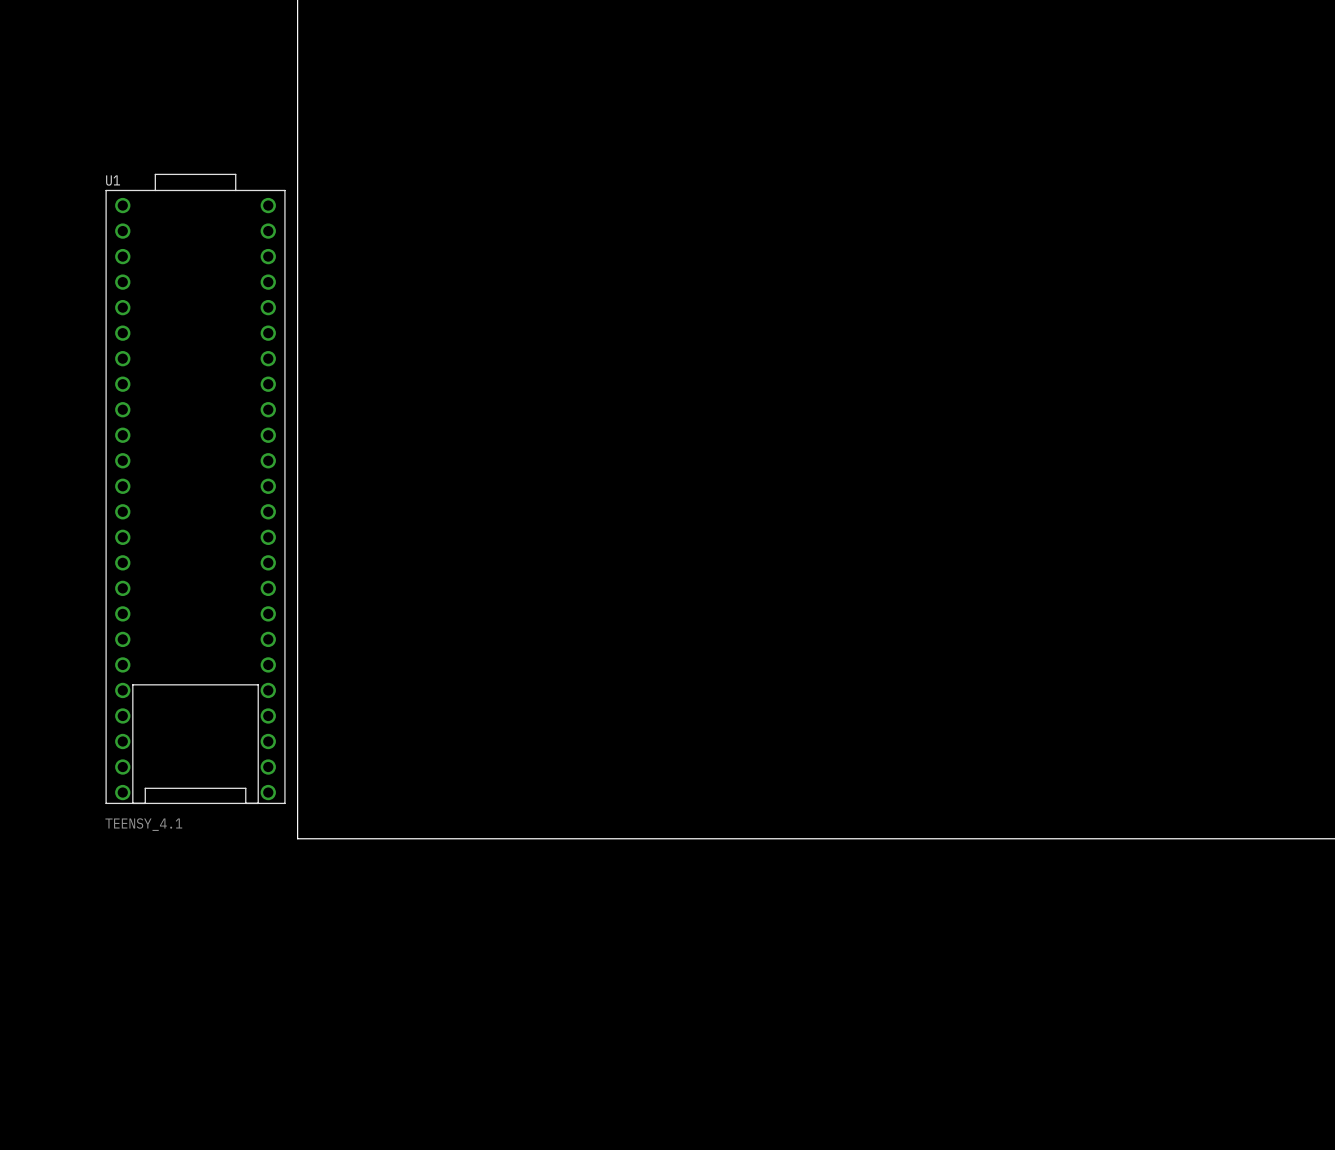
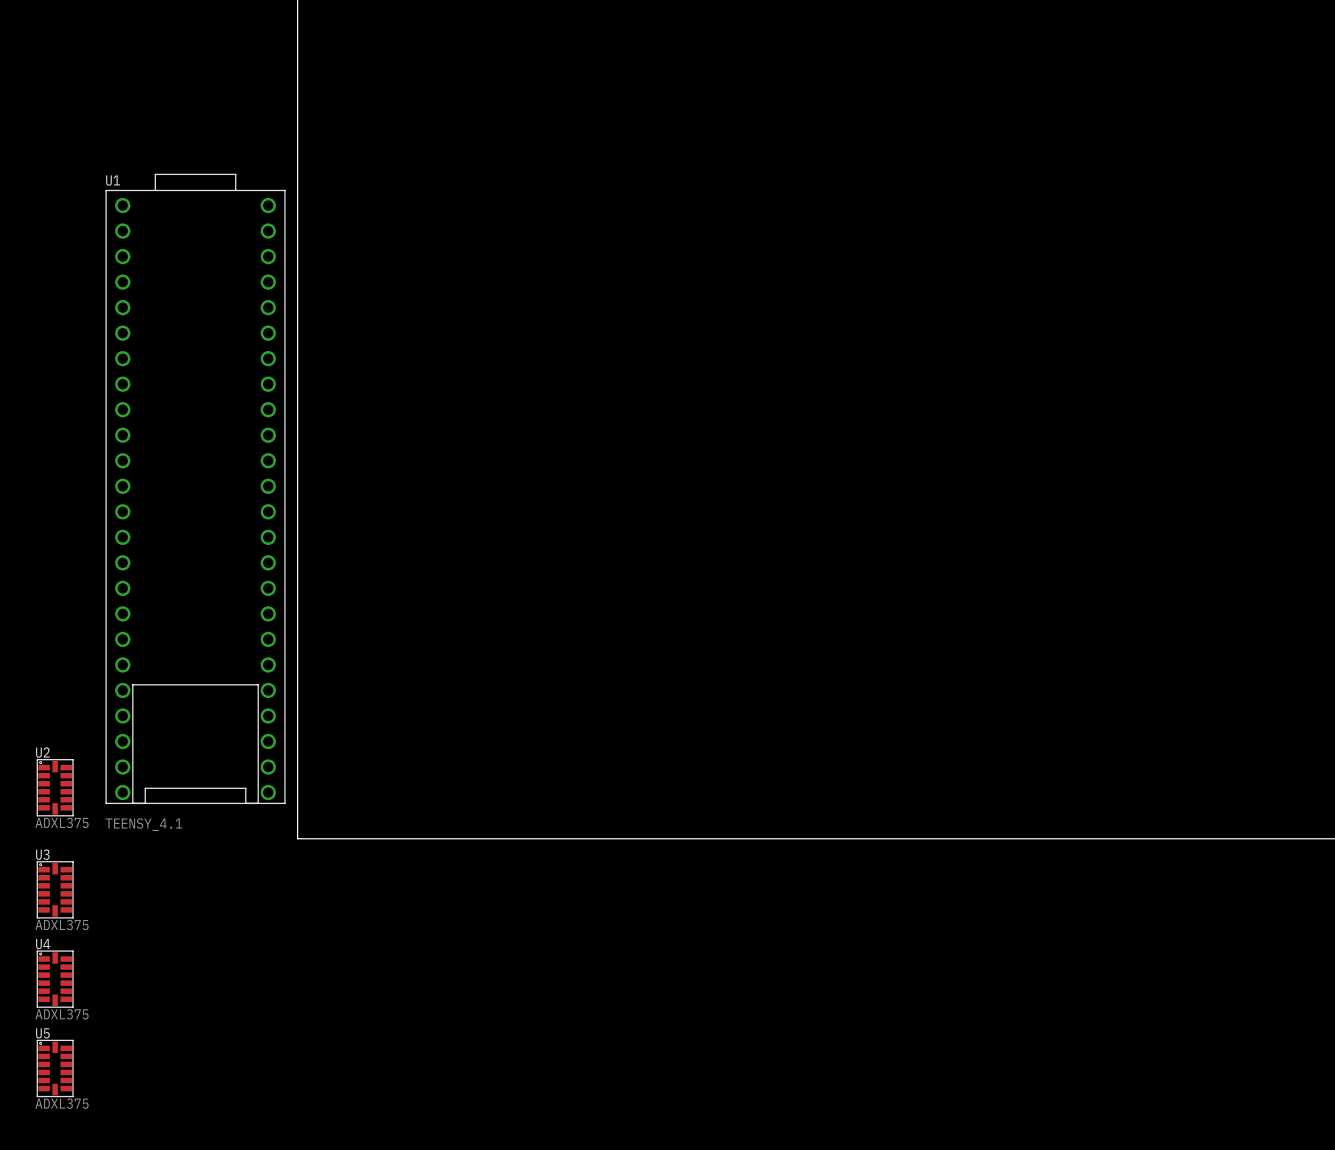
U2: none -> ADXL375 (55, 787)
U3: none -> ADXL375 (55, 889)
U4: none -> ADXL375 (55, 979)
U5: none -> ADXL375 (55, 1068)

